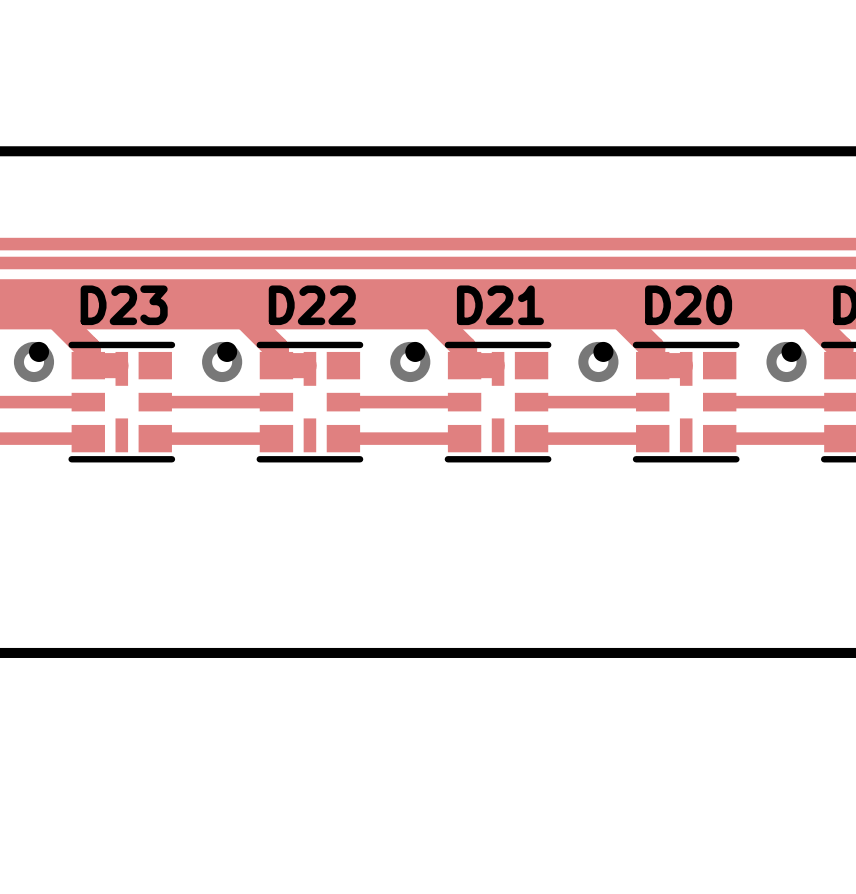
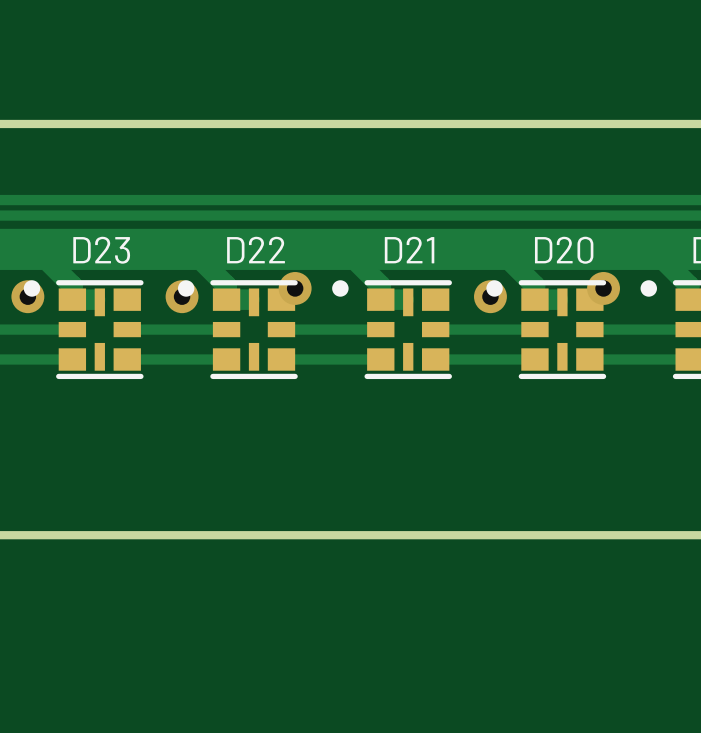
via position: (410, 361) -> (295, 288)
via position: (786, 361) -> (603, 288)

